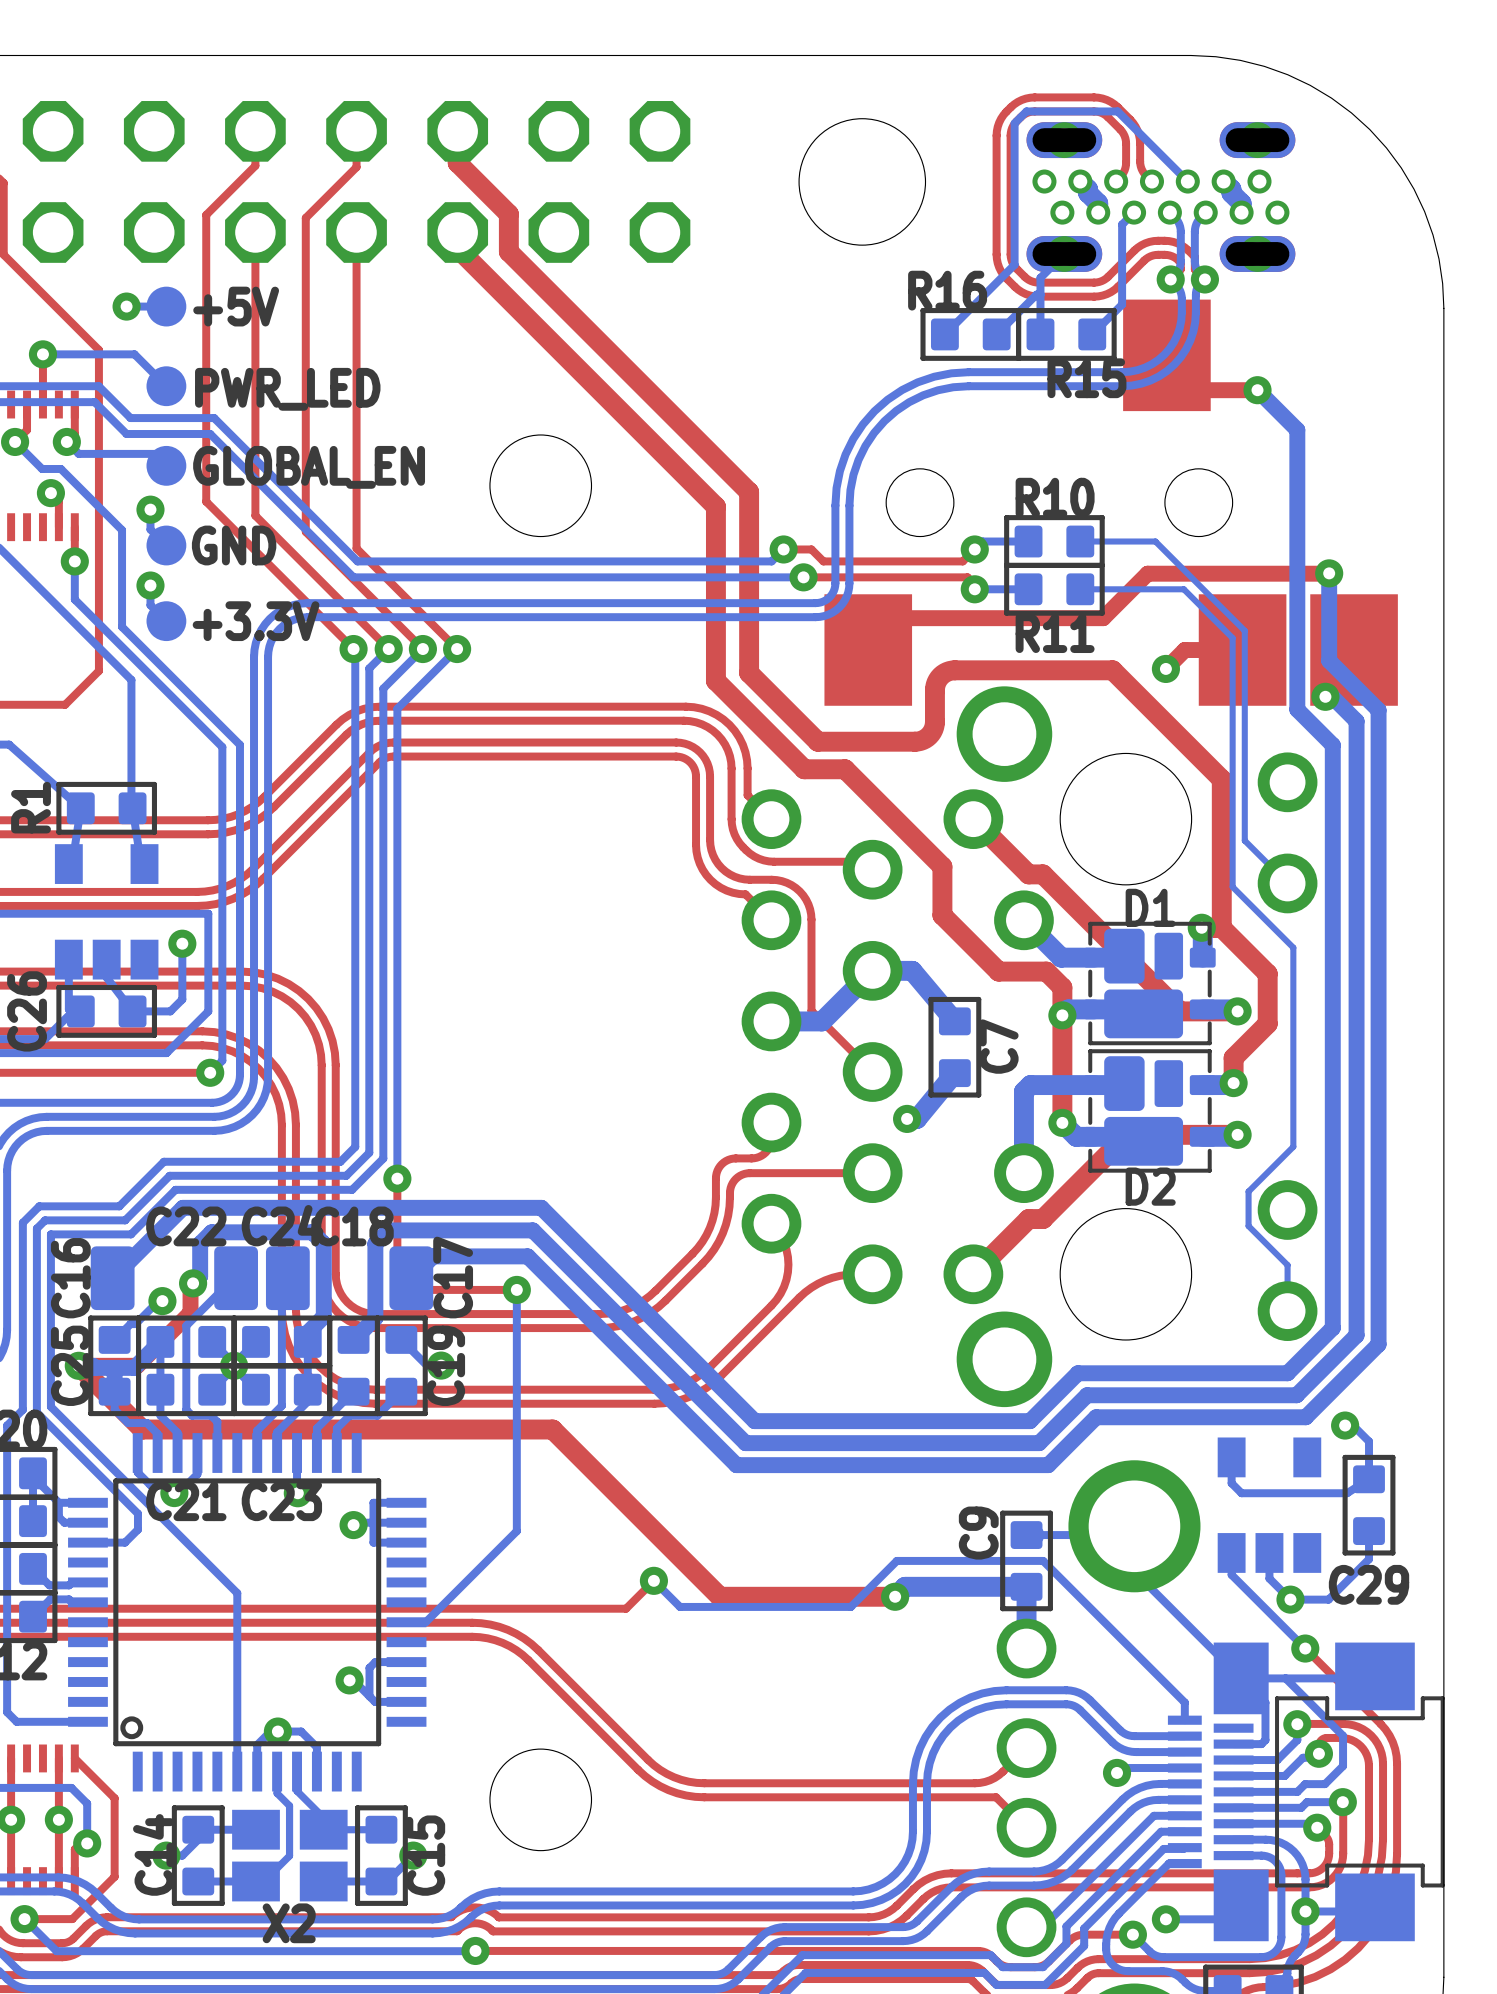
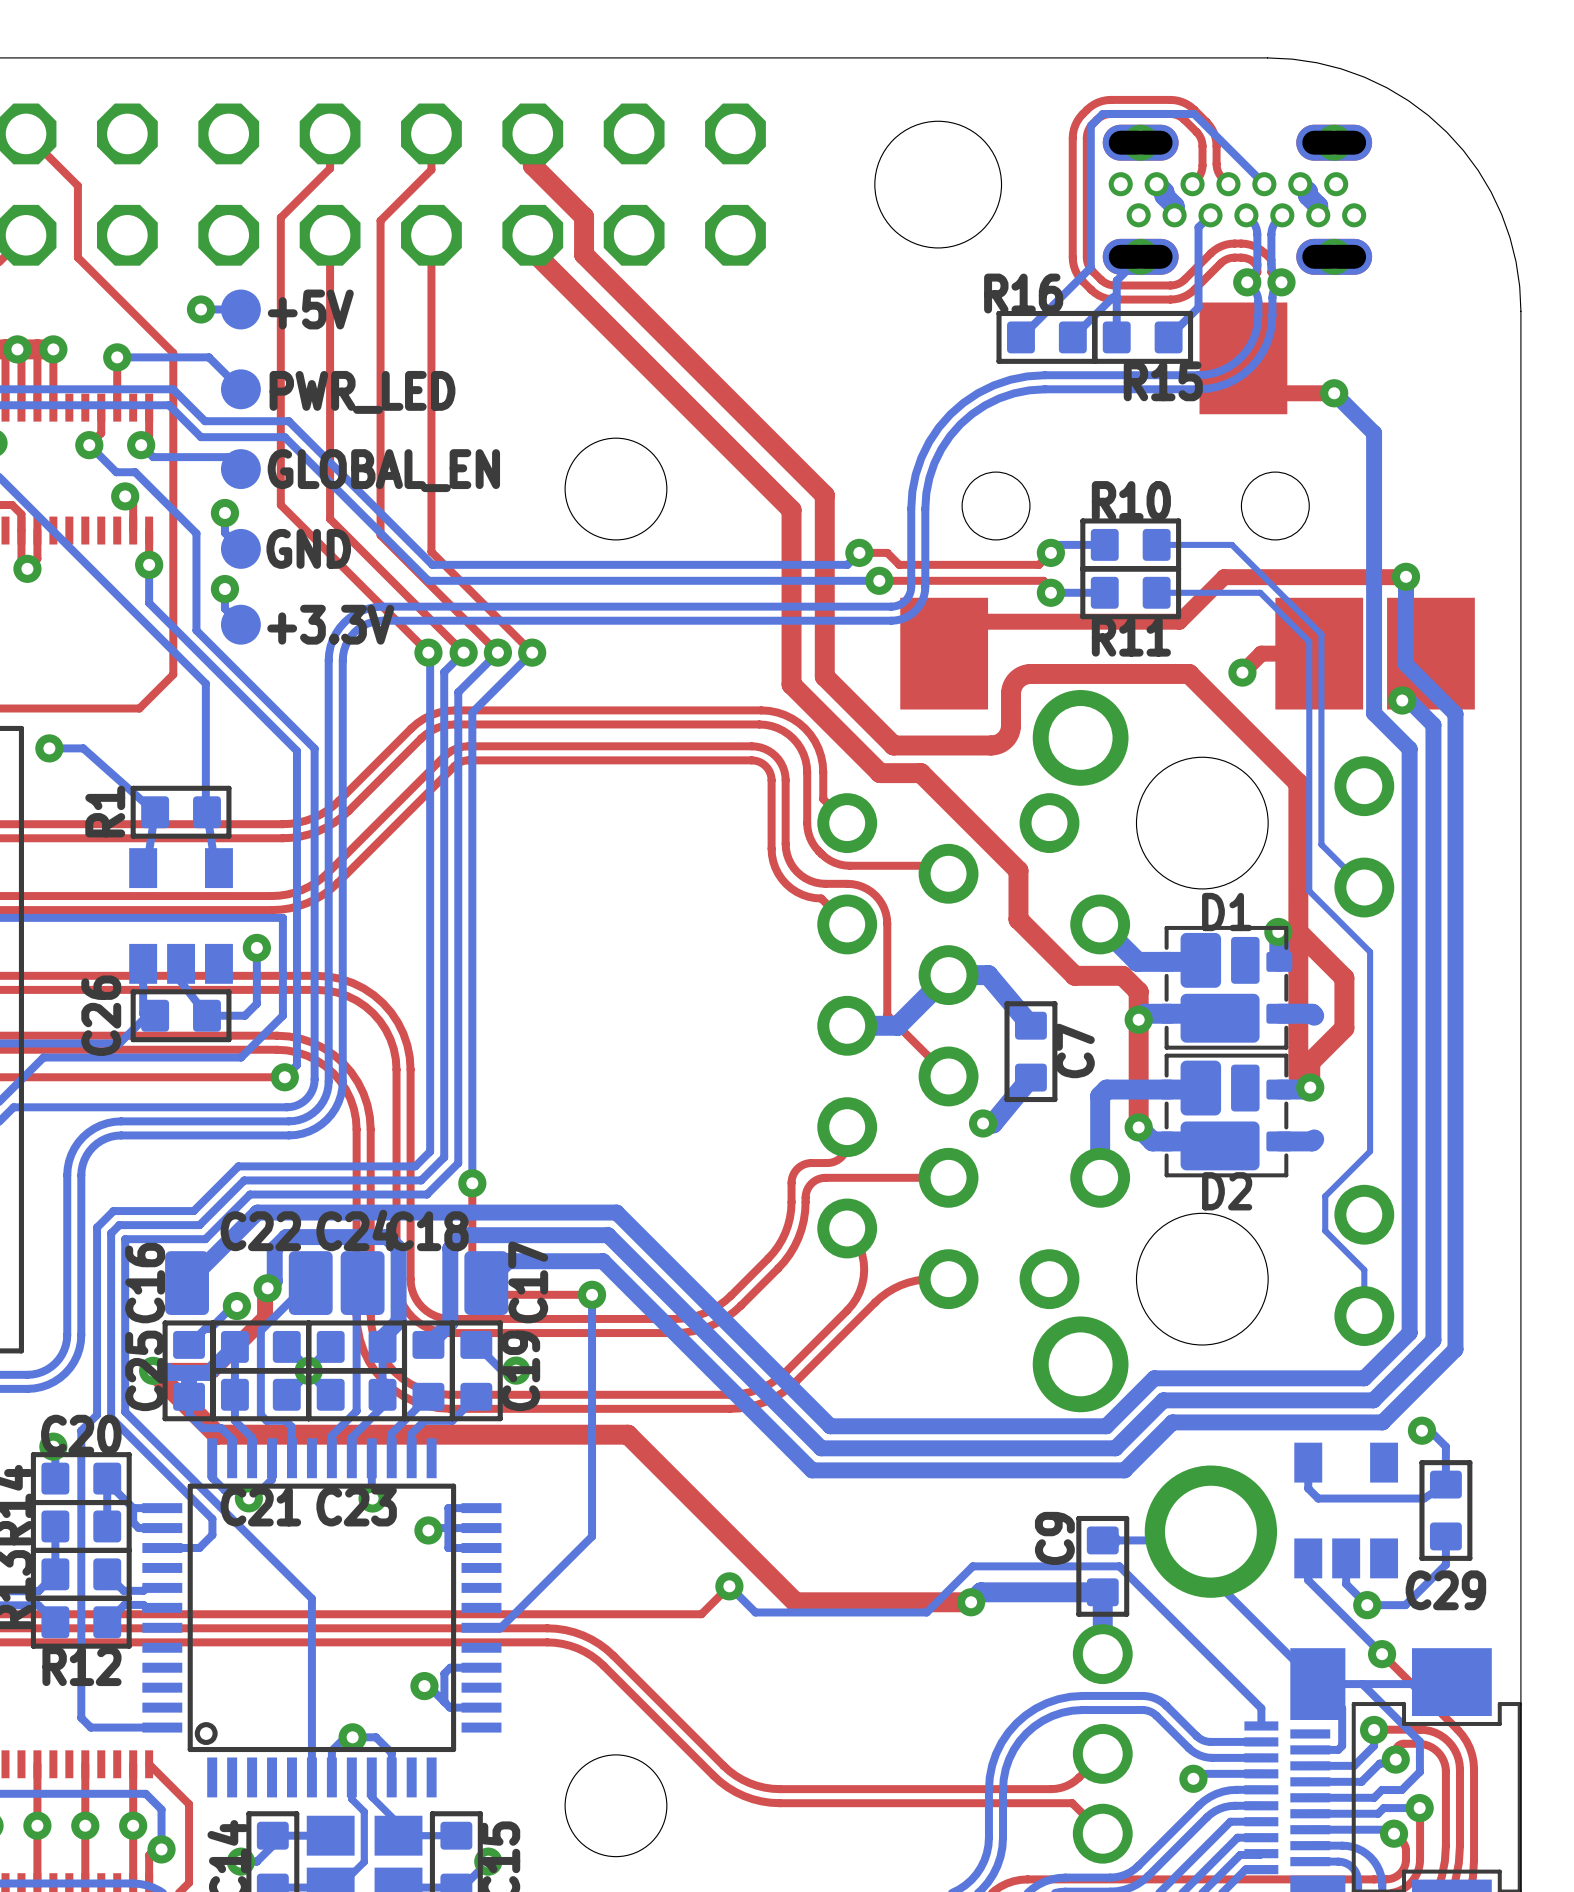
top track: (1221, 779) (1221, 927) -> (1298, 783) (1298, 1075)
top track: (973, 819) (1028, 874) (1042, 874) (1179, 1011) (1237, 1011) -> none
via: (1237, 1011) -> none
top track: (1237, 1134) (1127, 1134) (1042, 1219) (1028, 1219) (973, 1274) -> none
via: (1237, 1134) -> none

